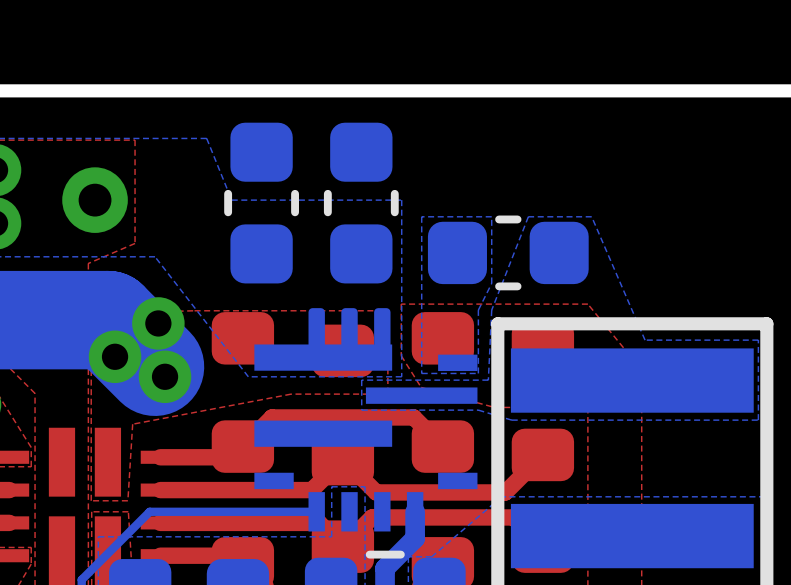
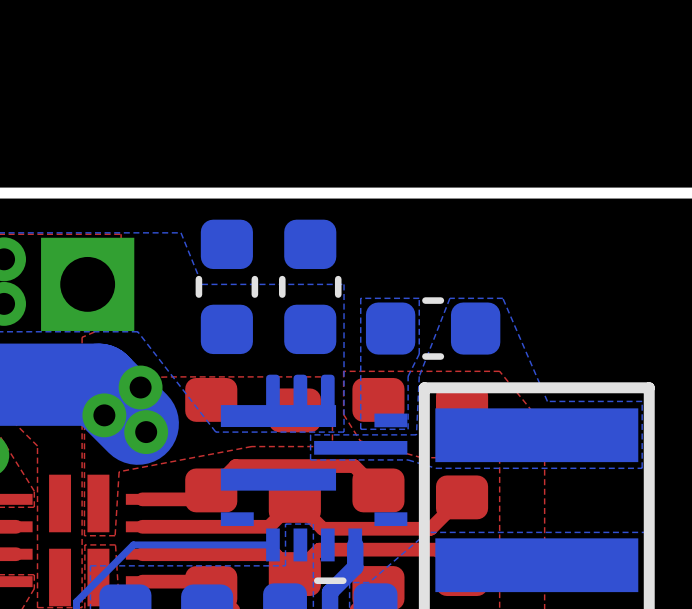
part footprint: [62, 167, 128, 233] -> [41, 237, 135, 332]

